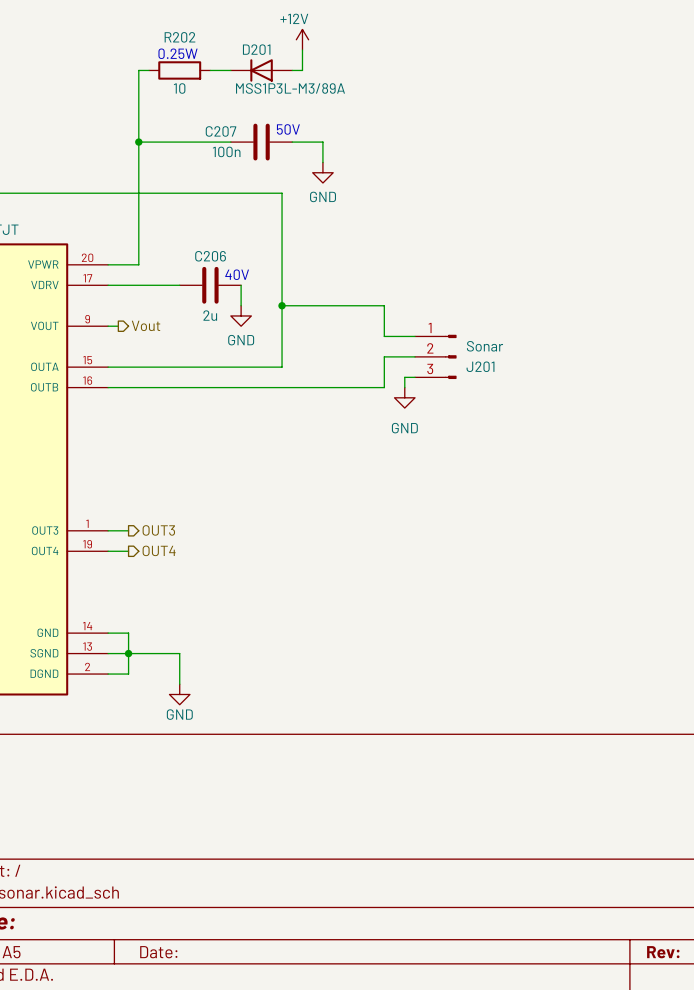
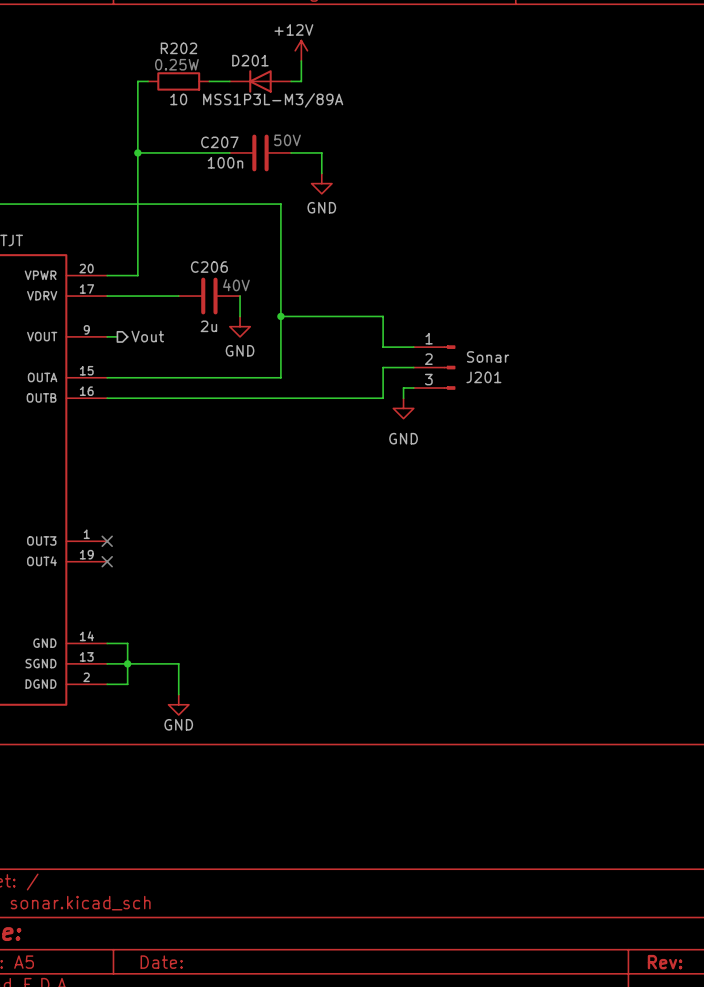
wire: (108, 530) (128, 530) -> none
no-connect mark: none -> (107, 541)
hierarchical label: OUT3 (158, 530) -> none
hierarchical label: OUT4 (159, 550) -> none
wire: (108, 551) (128, 551) -> none
no-connect mark: none -> (107, 561)

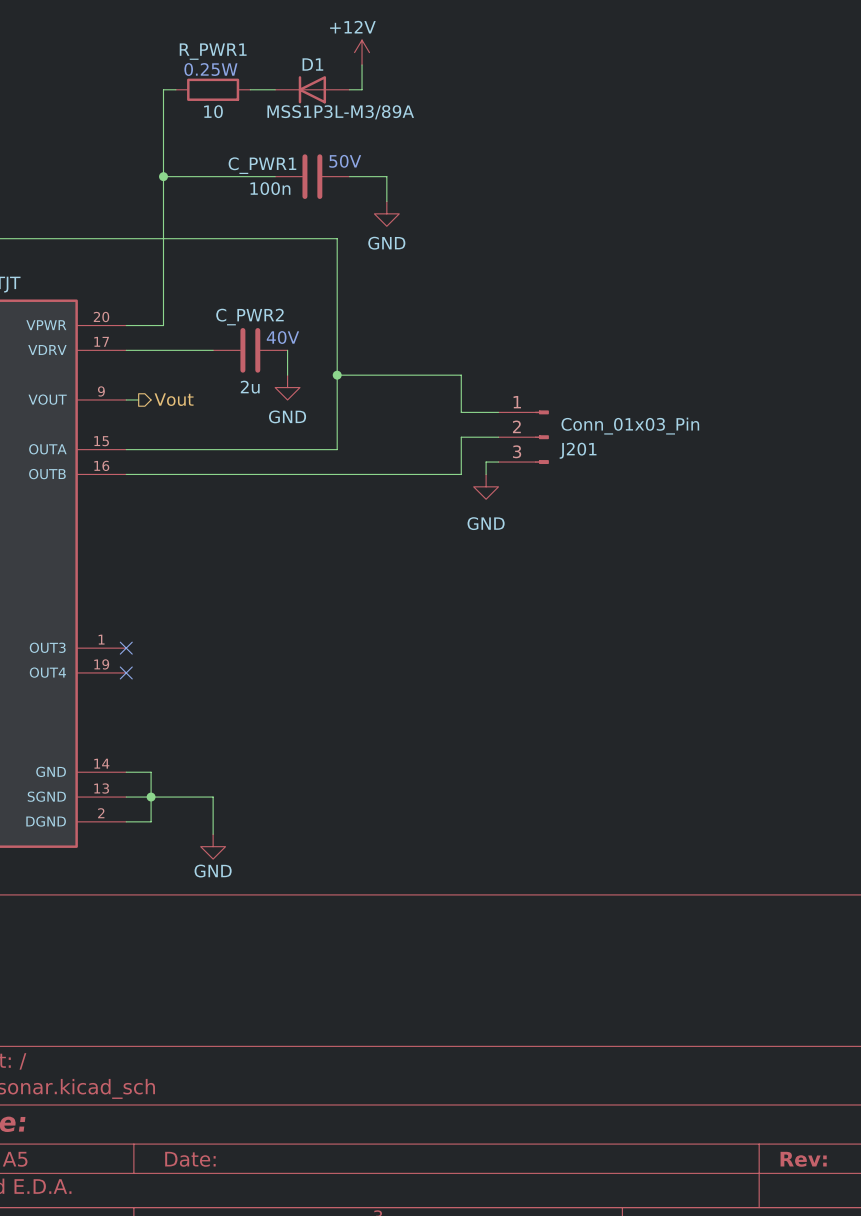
R202 name: R202 (178, 48) -> R_PWR1 (213, 51)
D201 name: D201 (250, 60) -> D1 (312, 64)
C207 name: C207 (219, 142) -> C_PWR1 (262, 165)
C206 name: C206 (209, 267) -> C_PWR2 (249, 317)
J201 value: Sonar (488, 356) -> Conn_01x03_Pin (630, 426)

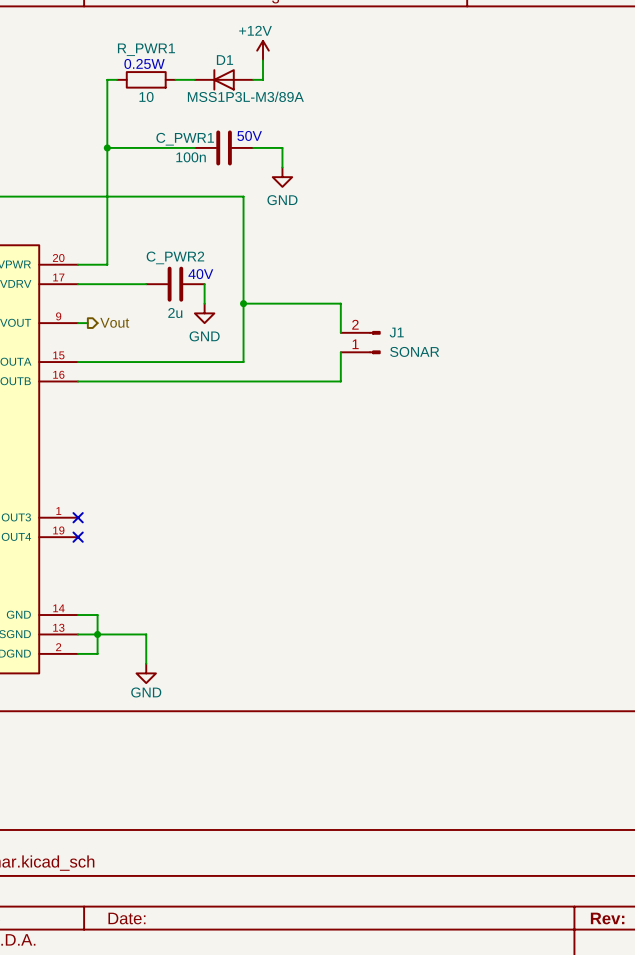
J1: none -> SONAR (360, 342)
J201: Conn_01x03_Pin (523, 437) -> none
wire: (498, 462) (486, 462) (486, 474) -> none
power symbol: GND (486, 486) -> none

